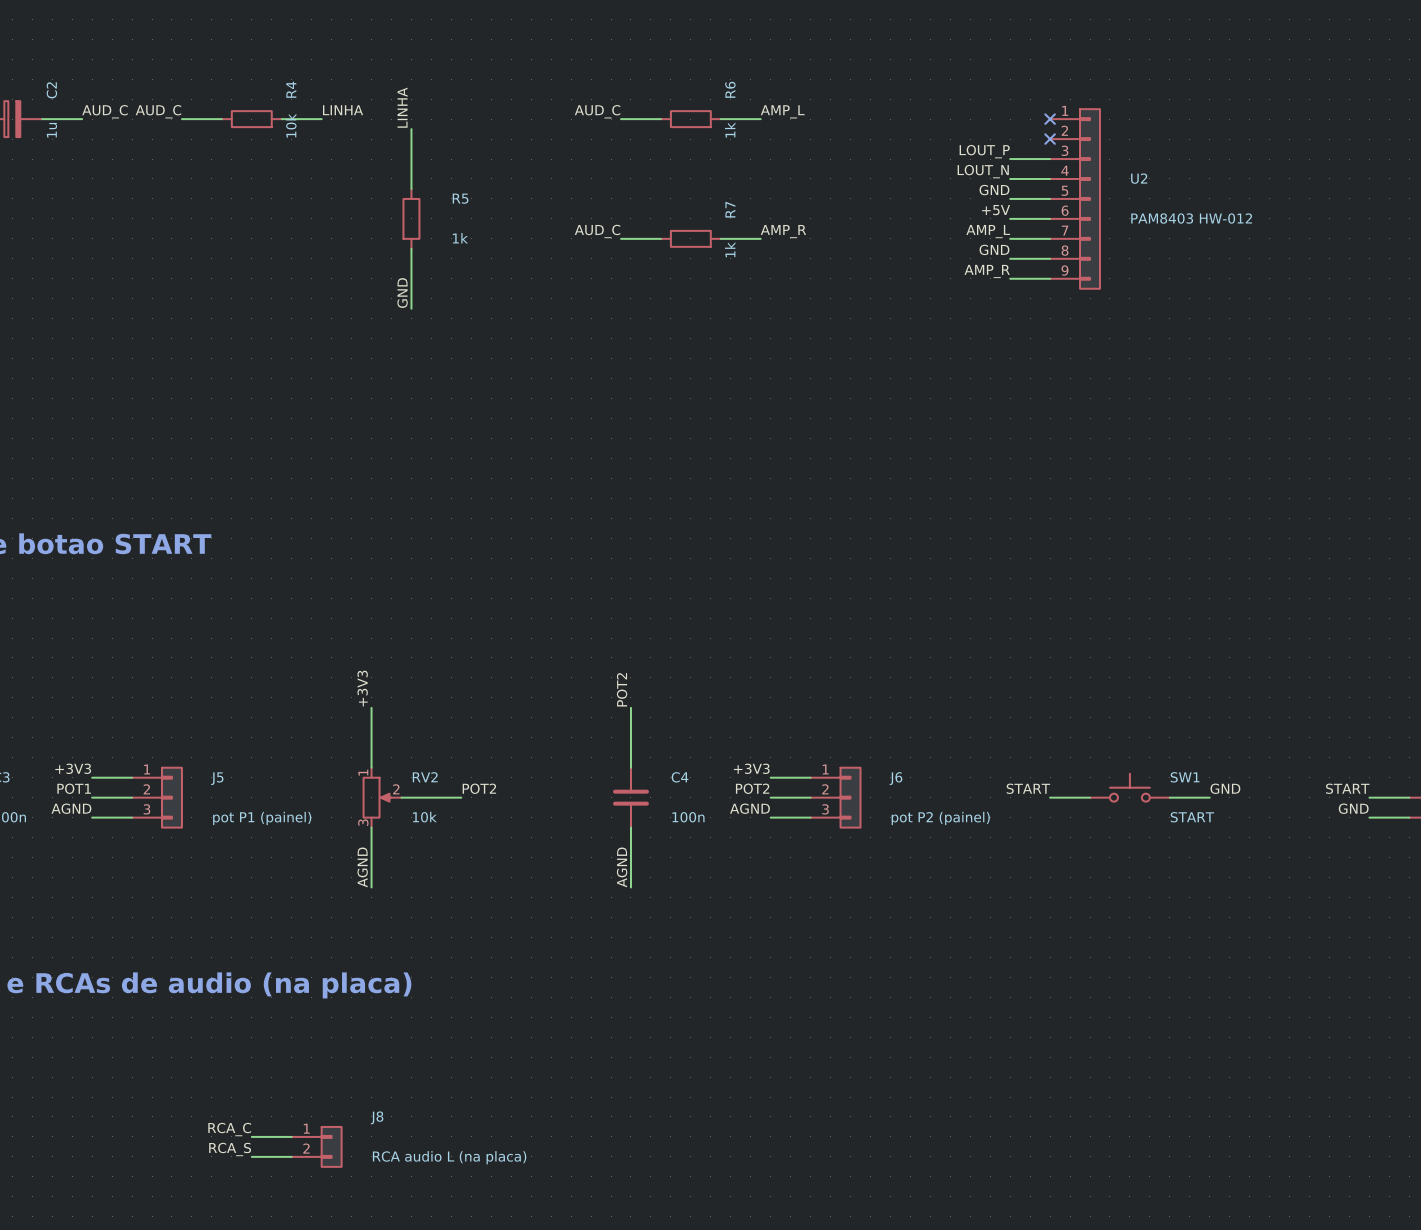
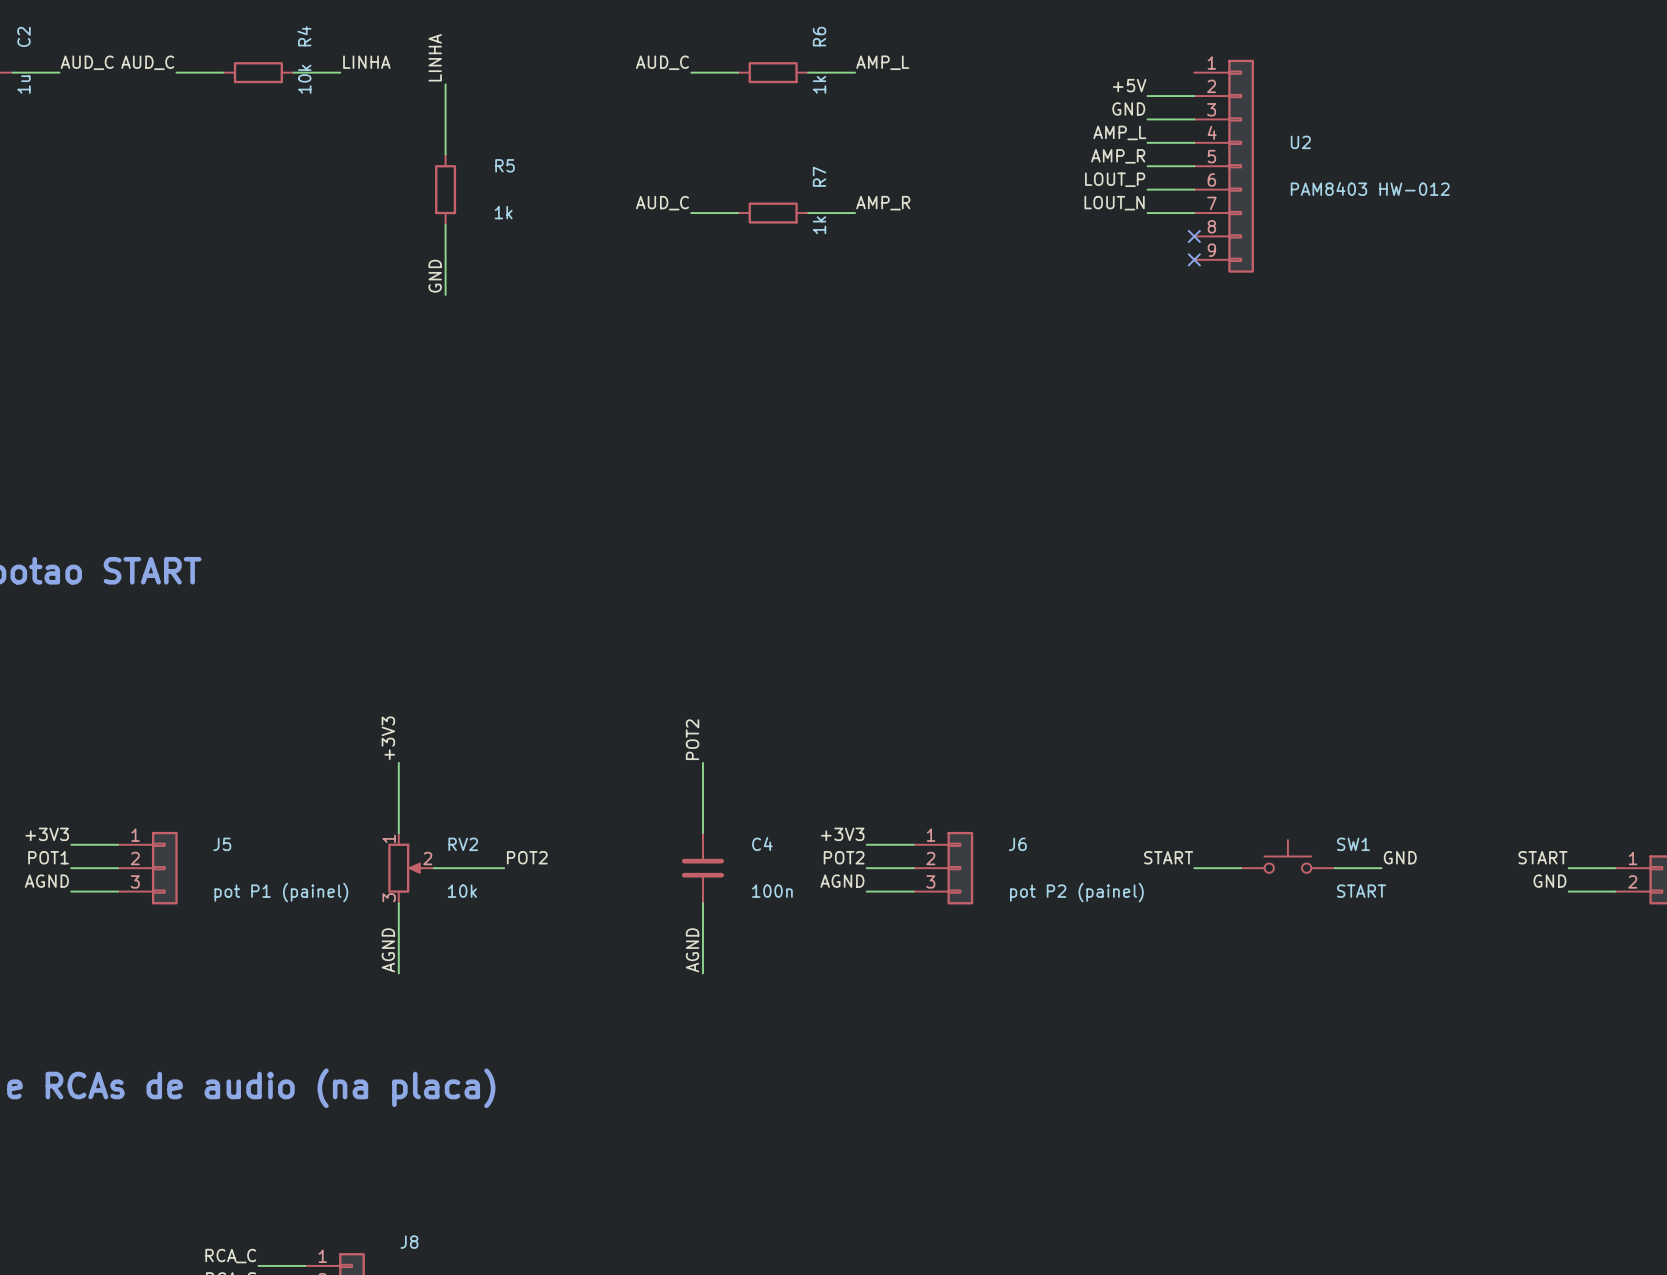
no-connect mark: (1050, 119) -> none
label: none -> +5V (1129, 85)
no-connect mark: (1050, 139) -> none
label: LOUT_P (984, 151) -> GND (1128, 109)
label: LOUT_N (983, 171) -> AMP_L (1119, 132)
label: GND (994, 190) -> AMP_R (1118, 156)
label: +5V (996, 210) -> LOUT_P (1115, 179)
label: AMP_L (988, 231) -> LOUT_N (1114, 203)
label: GND (994, 249) -> none
wire: (1010, 258) (1050, 258) -> (1147, 96) (1194, 96)
no-connect mark: none -> (1194, 236)
label: AMP_R (987, 271) -> none
wire: (1010, 278) (1050, 278) -> none
no-connect mark: none -> (1194, 259)

